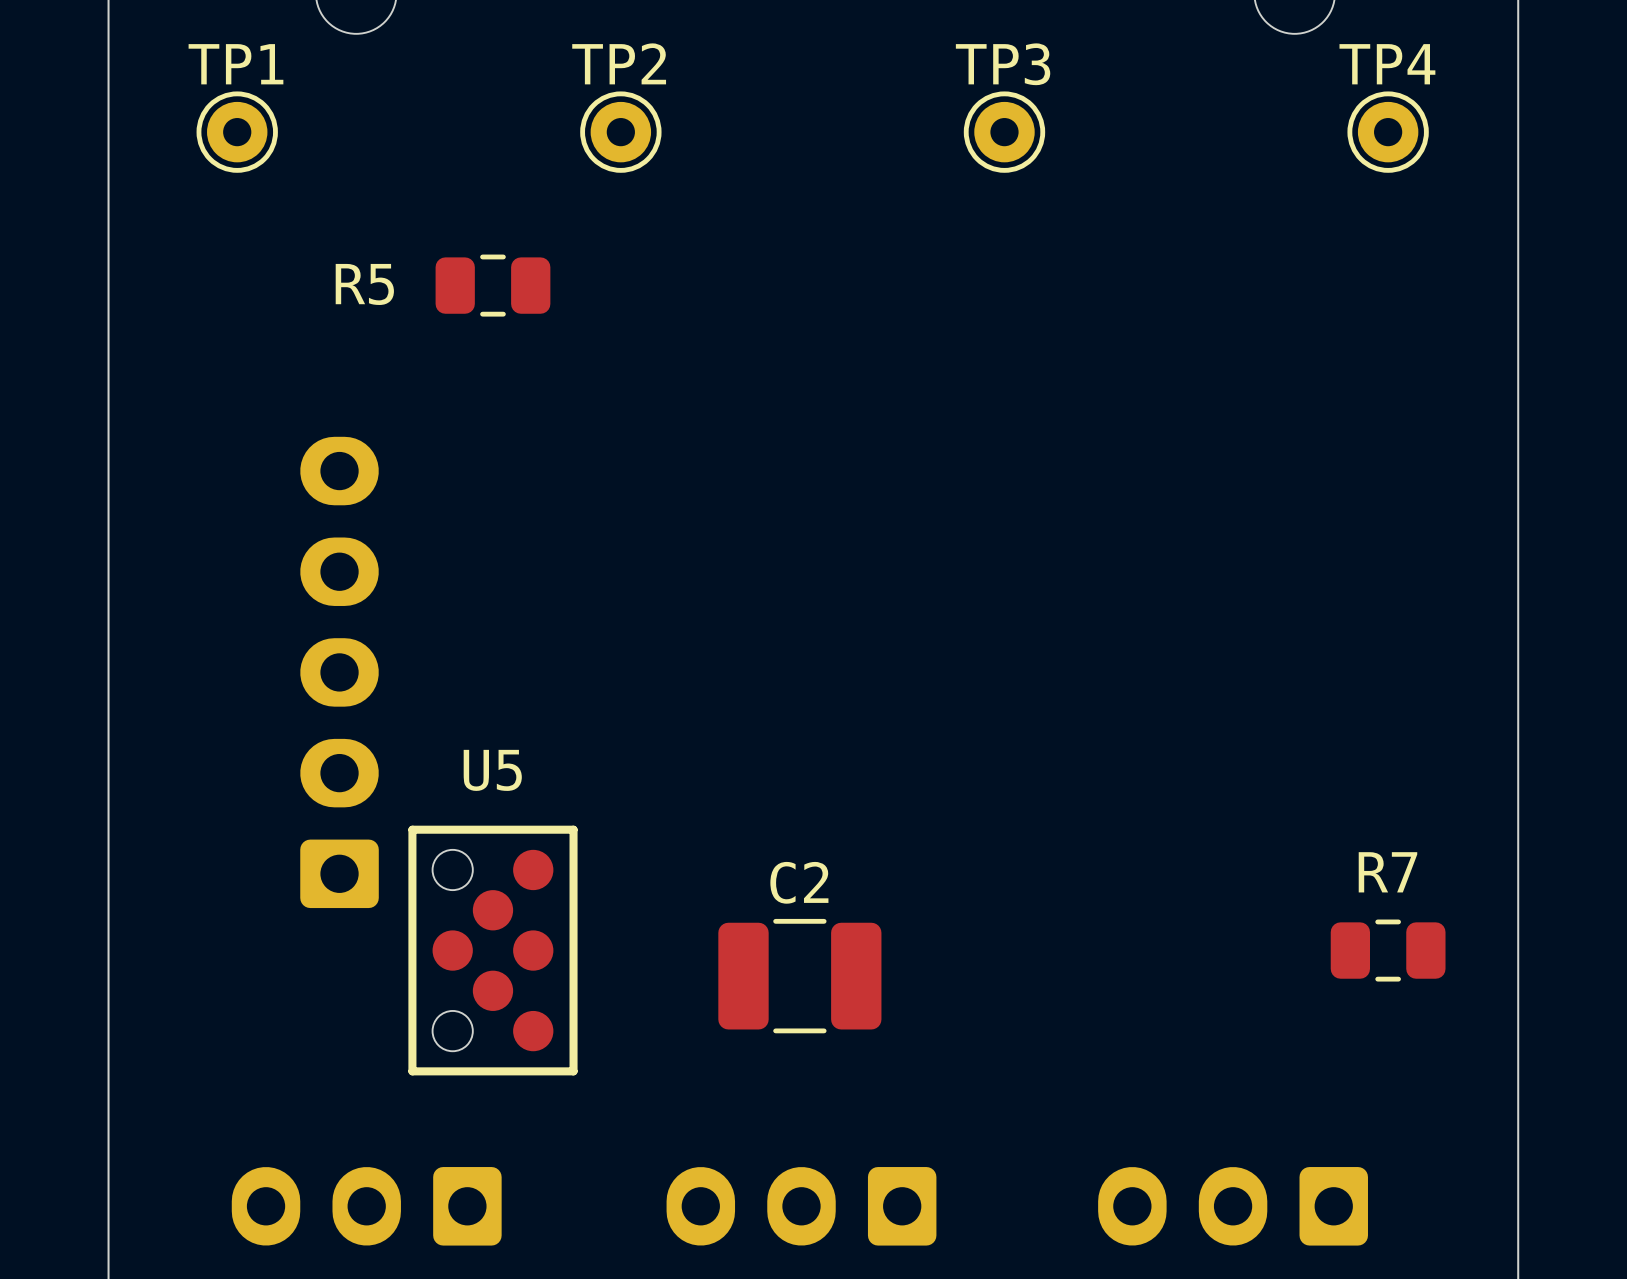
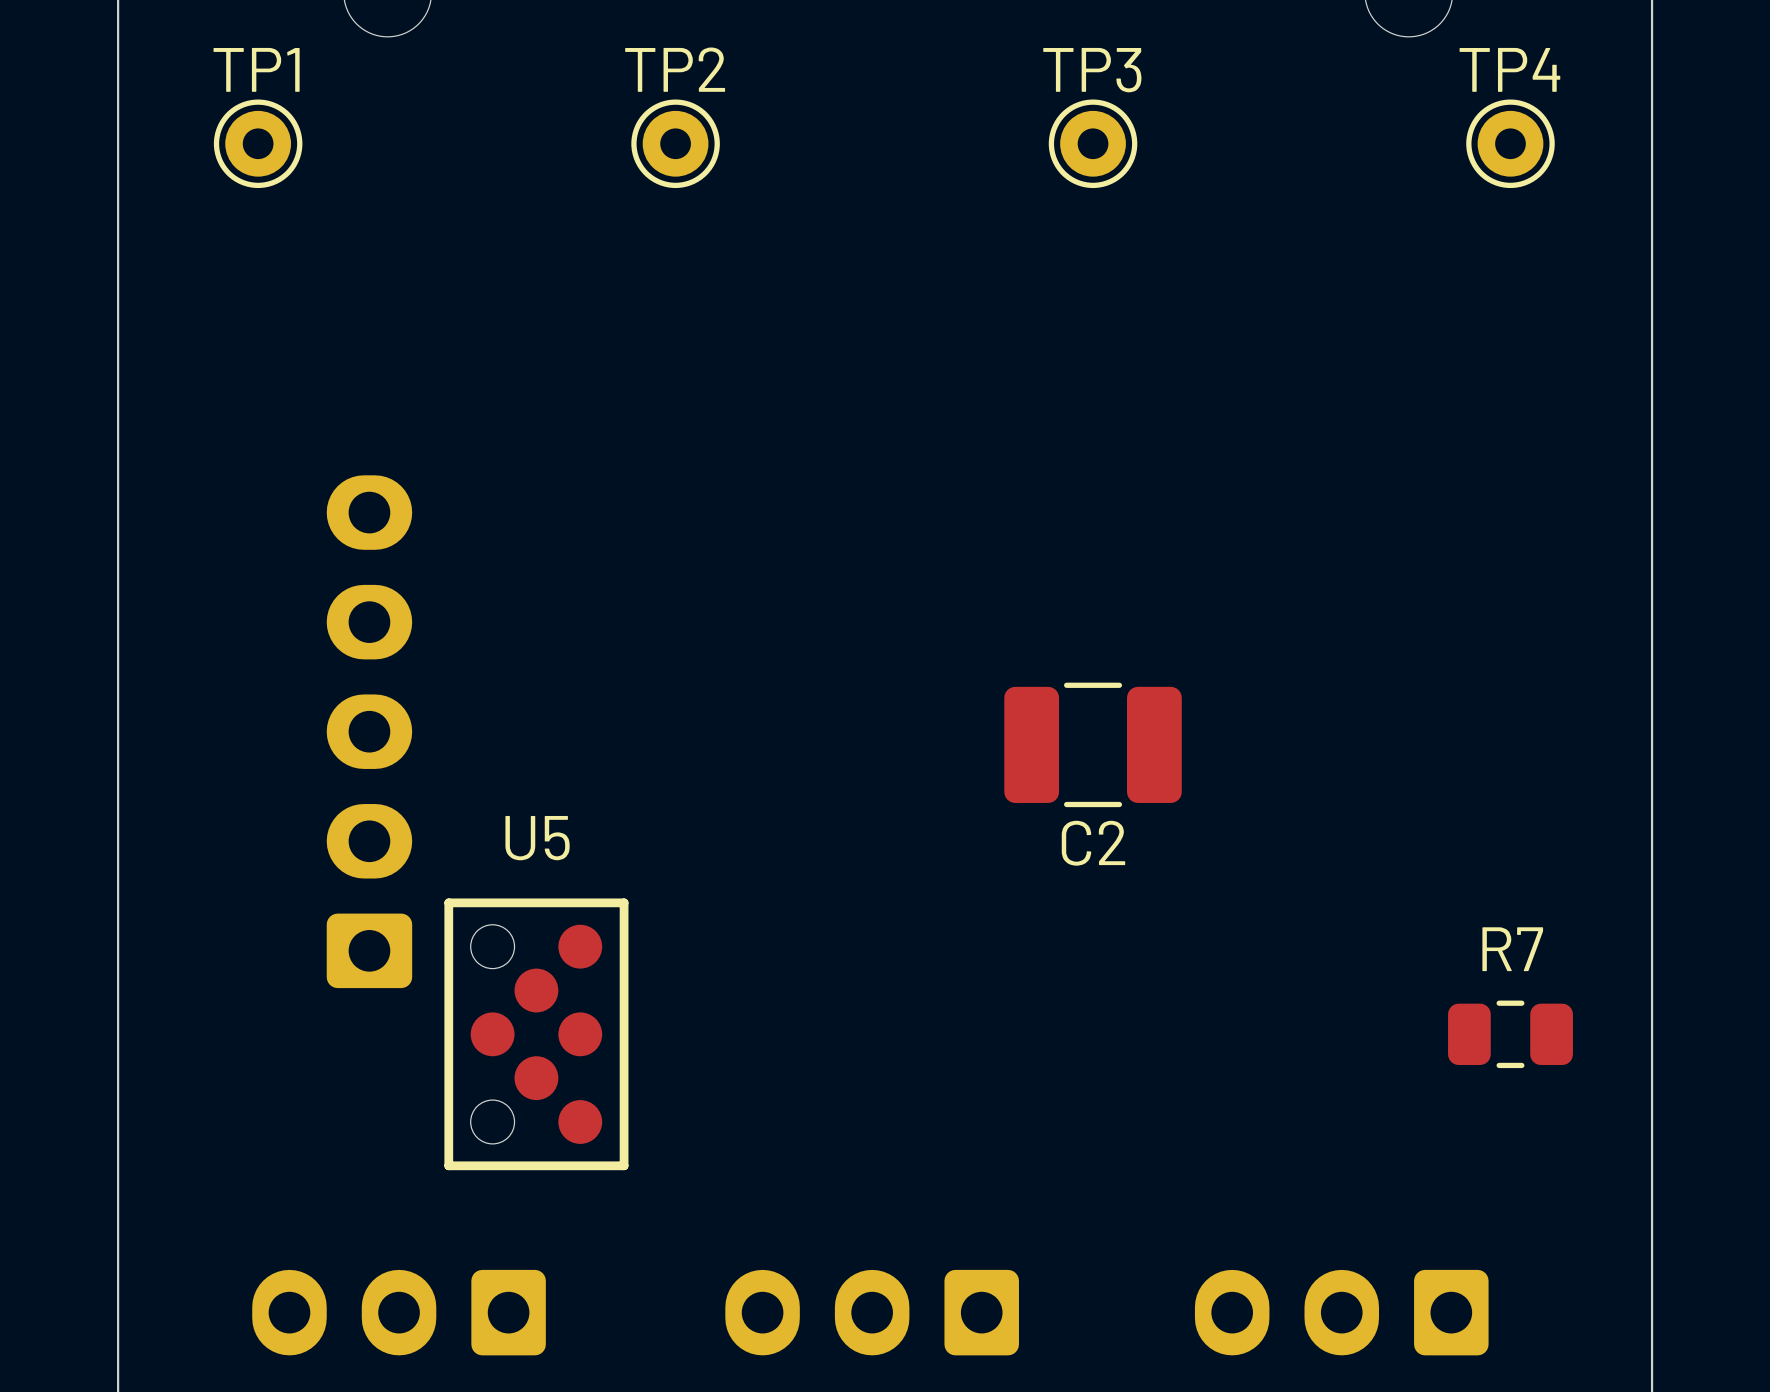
R5: (492, 285) -> none
C2 name position: C2 (799, 882) -> C2 (1093, 843)
C2 position: (799, 976) -> (1093, 744)

